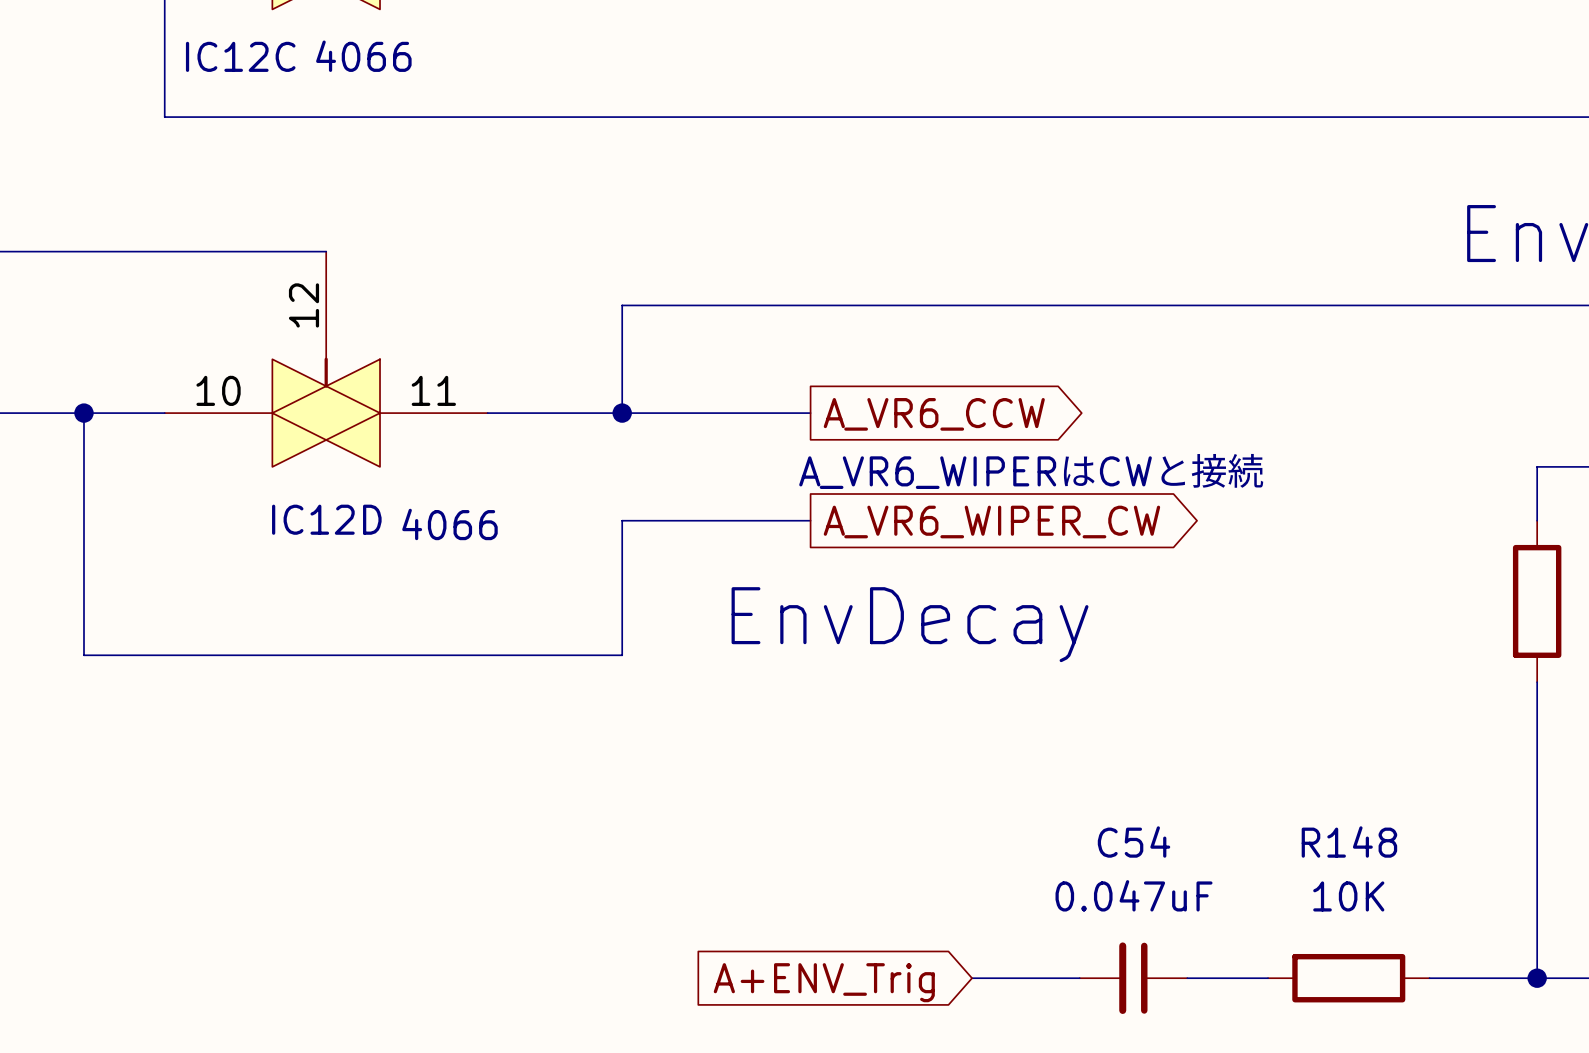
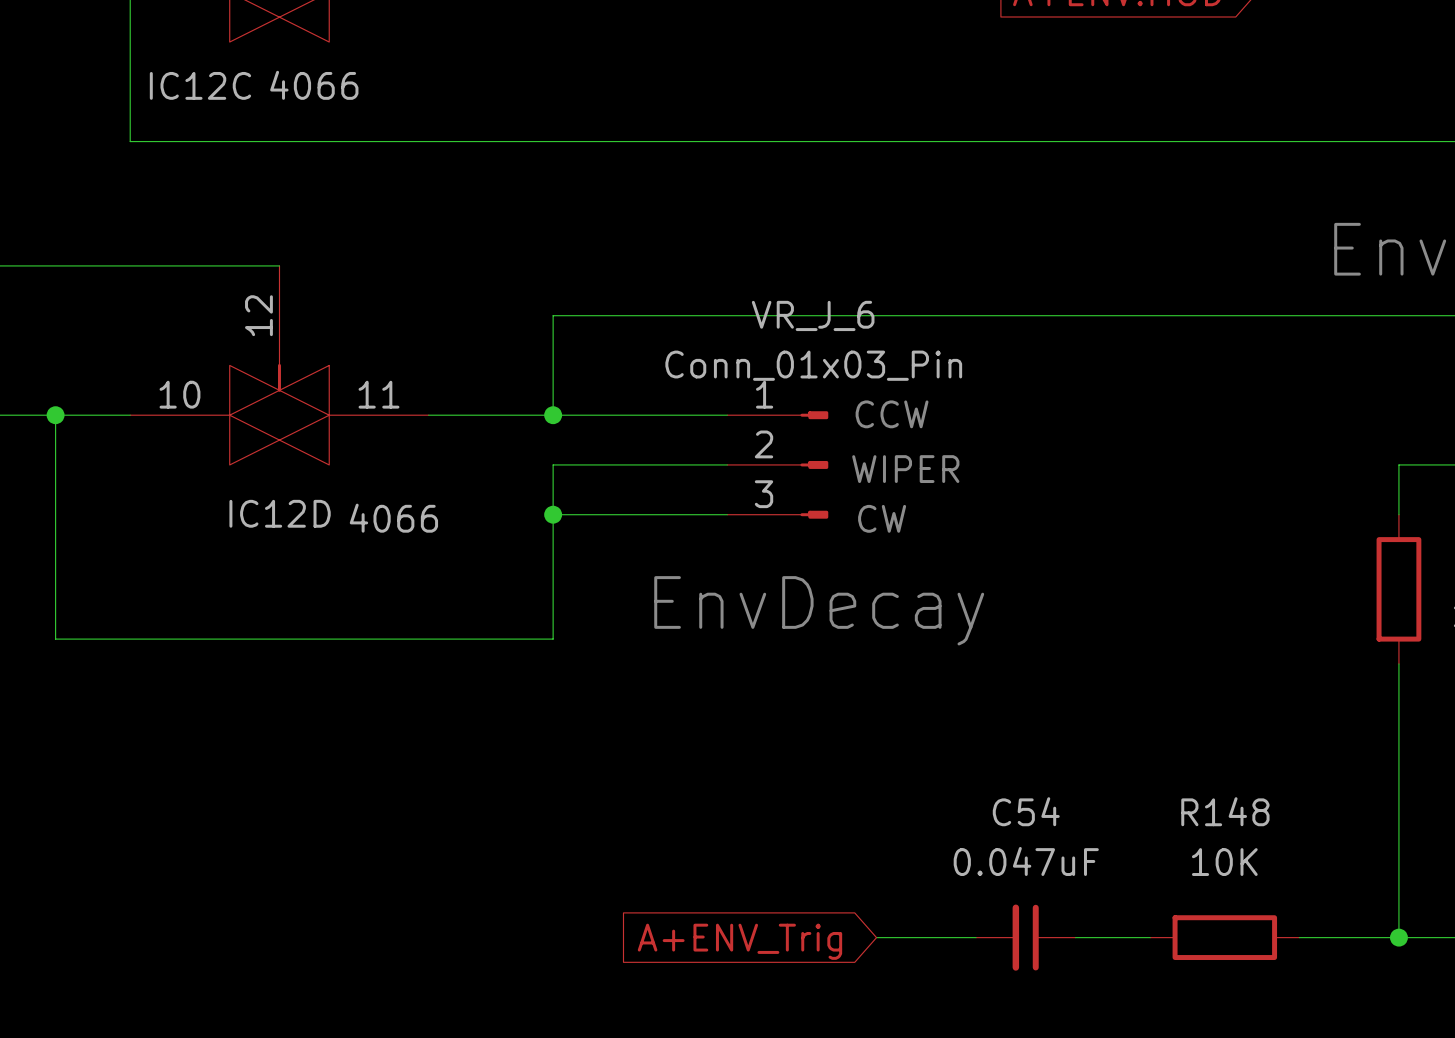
text: none -> CCW (892, 414)
global label: A_VR6_CCW (934, 414) -> none
wire: none -> (727, 464) (553, 464) (553, 514)
VR_J_6: none -> Conn_01x03_Pin (777, 464)
text: A_VR6_WIPERはCWと接続 (1032, 470) -> none
text: none -> WIPER (905, 469)
junction: none -> (553, 514)
global label: A_VR6_WIPER_CW (991, 522) -> none
text: none -> CW (882, 518)

